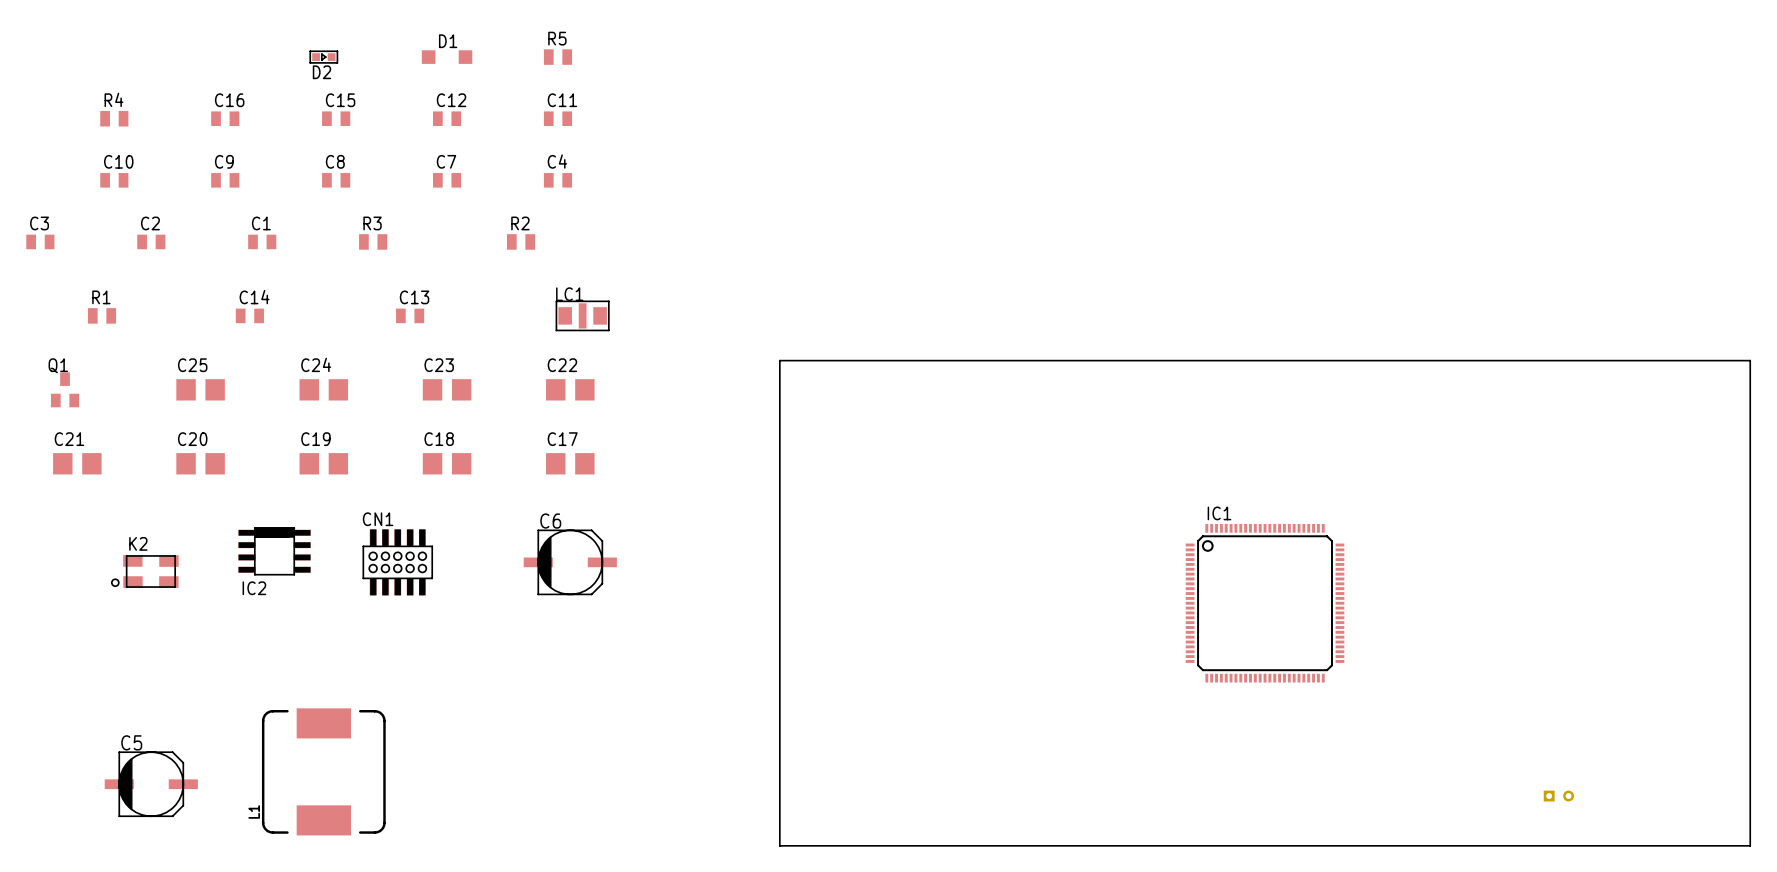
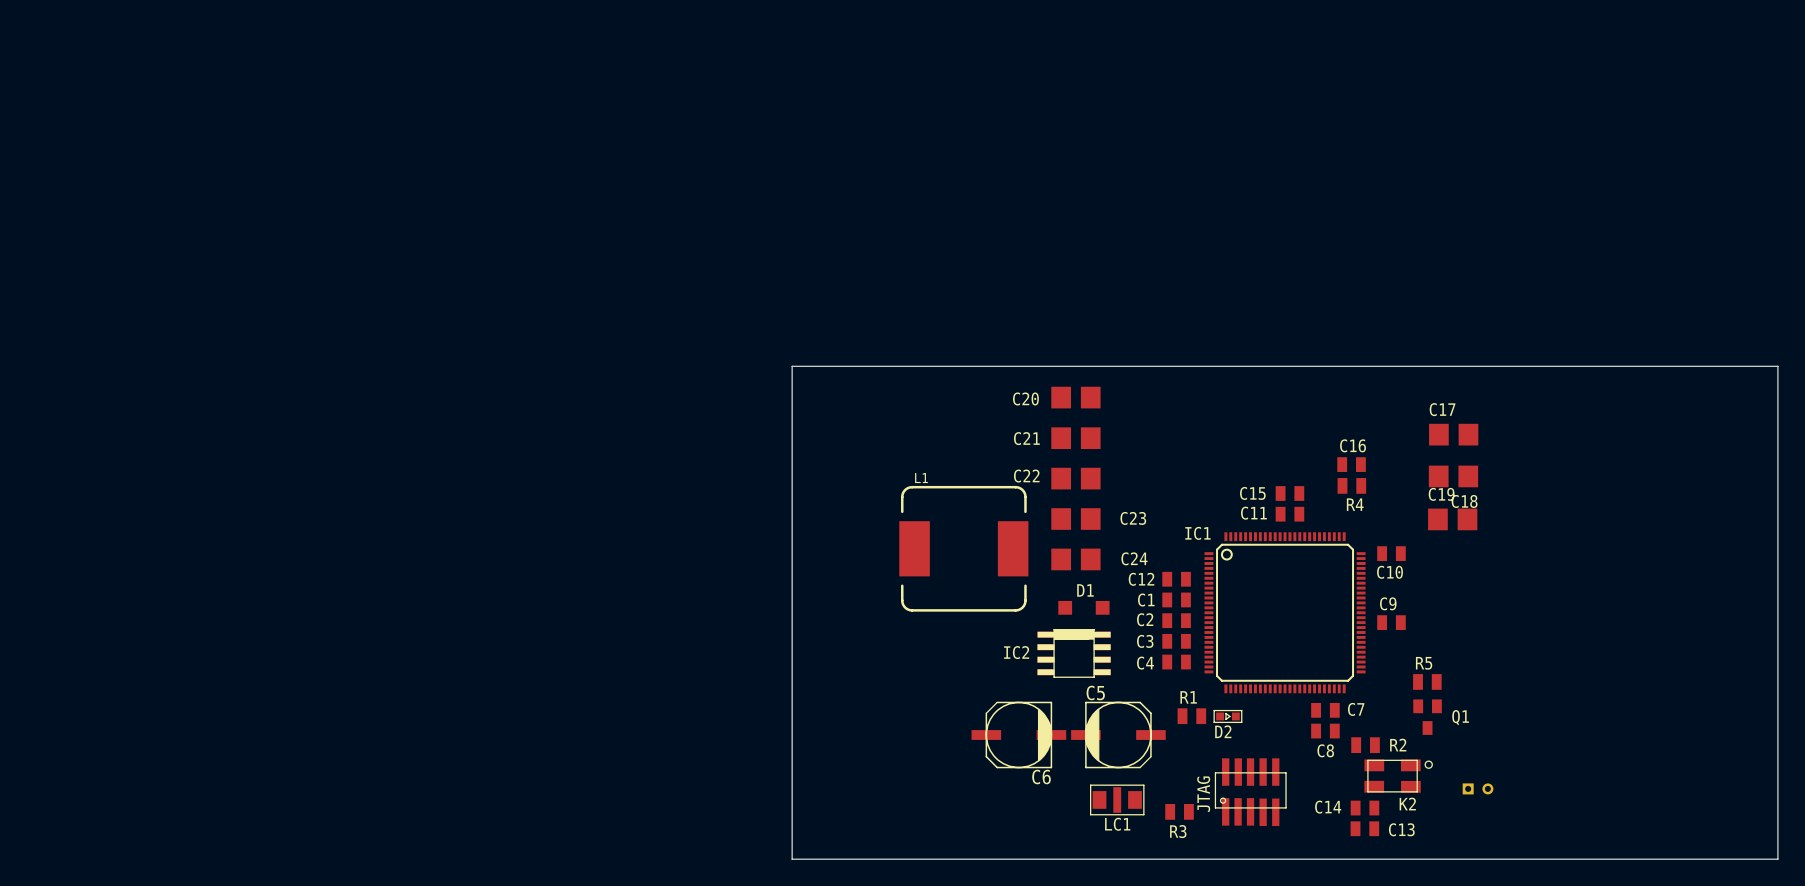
D1 name position: D1 (448, 41) -> D1 (1085, 590)
D2 position: (323, 57) -> (1227, 716)
D1 position: (447, 57) -> (1083, 607)
R5 position: (557, 57) -> (1427, 681)
R4 name position: R4 (114, 99) -> R4 (1355, 504)
C15 name position: C15 (340, 100) -> C15 (1252, 493)
C12 name position: C12 (451, 100) -> C12 (1141, 579)
C11 name position: C11 (562, 100) -> C11 (1253, 513)
R4 position: (114, 118) -> (1351, 485)
C16 position: (225, 118) -> (1351, 464)
C15 position: (336, 118) -> (1289, 493)
C12 position: (447, 118) -> (1176, 579)
C11 position: (557, 118) -> (1289, 514)
C10 name position: C10 (118, 161) -> C10 (1389, 572)
C8 name position: C8 (335, 161) -> C8 (1325, 750)
C7 name position: C7 (446, 161) -> C7 (1356, 709)
C4 name position: C4 (557, 161) -> C4 (1145, 663)
C10 position: (114, 180) -> (1391, 553)
C9 position: (225, 180) -> (1391, 622)
C8 position: (336, 180) -> (1325, 731)
C7 position: (447, 180) -> (1325, 710)
C4 position: (557, 180) -> (1176, 662)
C3 name position: C3 (39, 223) -> C3 (1145, 641)
C2 name position: C2 (150, 223) -> C2 (1145, 619)
C1 name position: C1 (261, 223) -> C1 (1146, 600)
R3 name position: R3 (372, 223) -> R3 (1178, 831)
R2 name position: R2 (520, 223) -> R2 (1398, 745)
C3 position: (40, 241) -> (1176, 641)
C2 position: (151, 241) -> (1176, 620)
C1 position: (262, 241) -> (1176, 599)
R3 position: (373, 241) -> (1179, 811)
R2 position: (521, 241) -> (1365, 745)
LC1 name position: LC1 (569, 294) -> LC1 (1117, 824)
C14 name position: C14 (254, 297) -> C14 (1328, 807)
C13 name position: C13 (414, 297) -> C13 (1401, 829)
R1 position: (102, 315) -> (1191, 716)
C14 position: (249, 315) -> (1364, 808)
C13 position: (410, 315) -> (1364, 828)
LC1 position: (582, 315) -> (1117, 799)
C24 name position: C24 (316, 364) -> C24 (1134, 558)
Q1 name position: Q1 (58, 365) -> Q1 (1460, 717)
C23 name position: C23 (439, 365) -> C23 (1133, 518)
C22 name position: C22 (562, 365) -> C22 (1026, 476)
Q1 rotation: 0° (65, 389) -> 180° (1427, 717)
Q1 position: (65, 389) -> (1427, 717)
C25: (200, 389) -> none
C24 position: (323, 389) -> (1075, 559)
C23 position: (447, 389) -> (1075, 519)
C22 position: (570, 389) -> (1075, 478)
C21 name position: C21 (69, 439) -> C21 (1026, 438)
C20 name position: C20 (192, 439) -> C20 (1025, 398)
C18 name position: C18 (439, 439) -> C18 (1464, 501)
C21 position: (77, 463) -> (1075, 438)
C20 position: (200, 463) -> (1075, 397)
C19 position: (323, 463) -> (1452, 519)
C18 position: (447, 463) -> (1453, 476)
C17 position: (570, 463) -> (1453, 434)
IC1 name position: IC1 (1219, 513) -> IC1 (1197, 533)
IC2 position: (274, 551) -> (1074, 653)
CN1: (397, 562) -> none
C6 rotation: 0° (570, 562) -> 180° (1018, 735)
C6 position: (570, 562) -> (1018, 735)
K2 rotation: 0° (144, 571) -> 180° (1398, 776)
K2 position: (144, 571) -> (1398, 776)
IC2 name position: IC2 (254, 588) -> IC2 (1016, 652)
L1 rotation: 0° (323, 771) -> 90° clockwise (963, 548)
L1 position: (323, 771) -> (963, 548)
part: none -> (1250, 792)
C5 position: (151, 784) -> (1118, 735)
part position: (1558, 796) -> (1478, 788)

